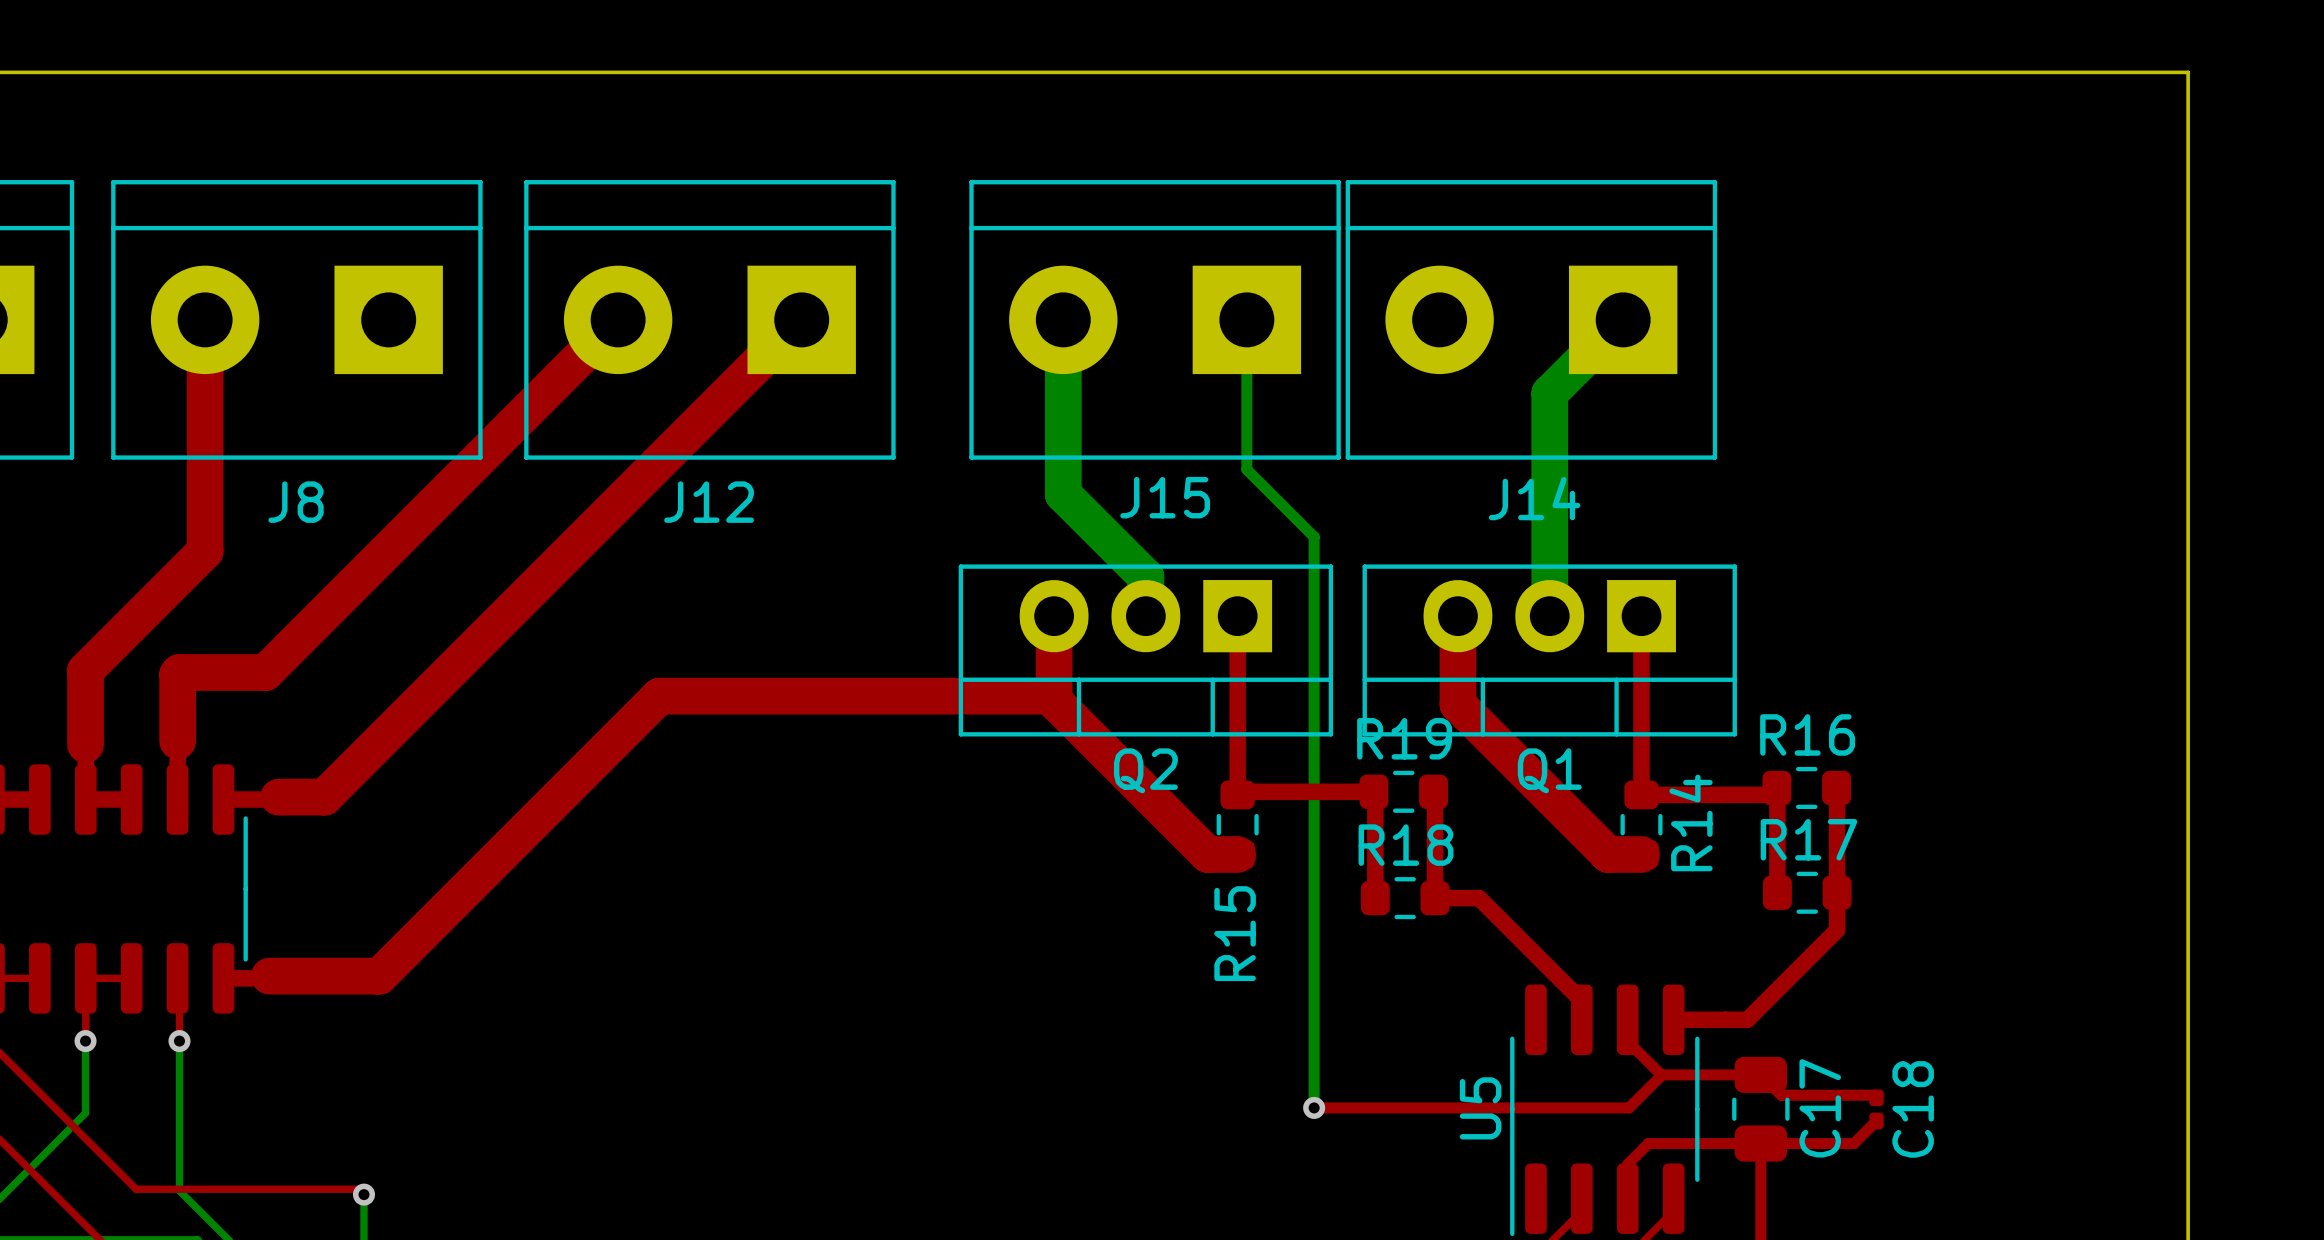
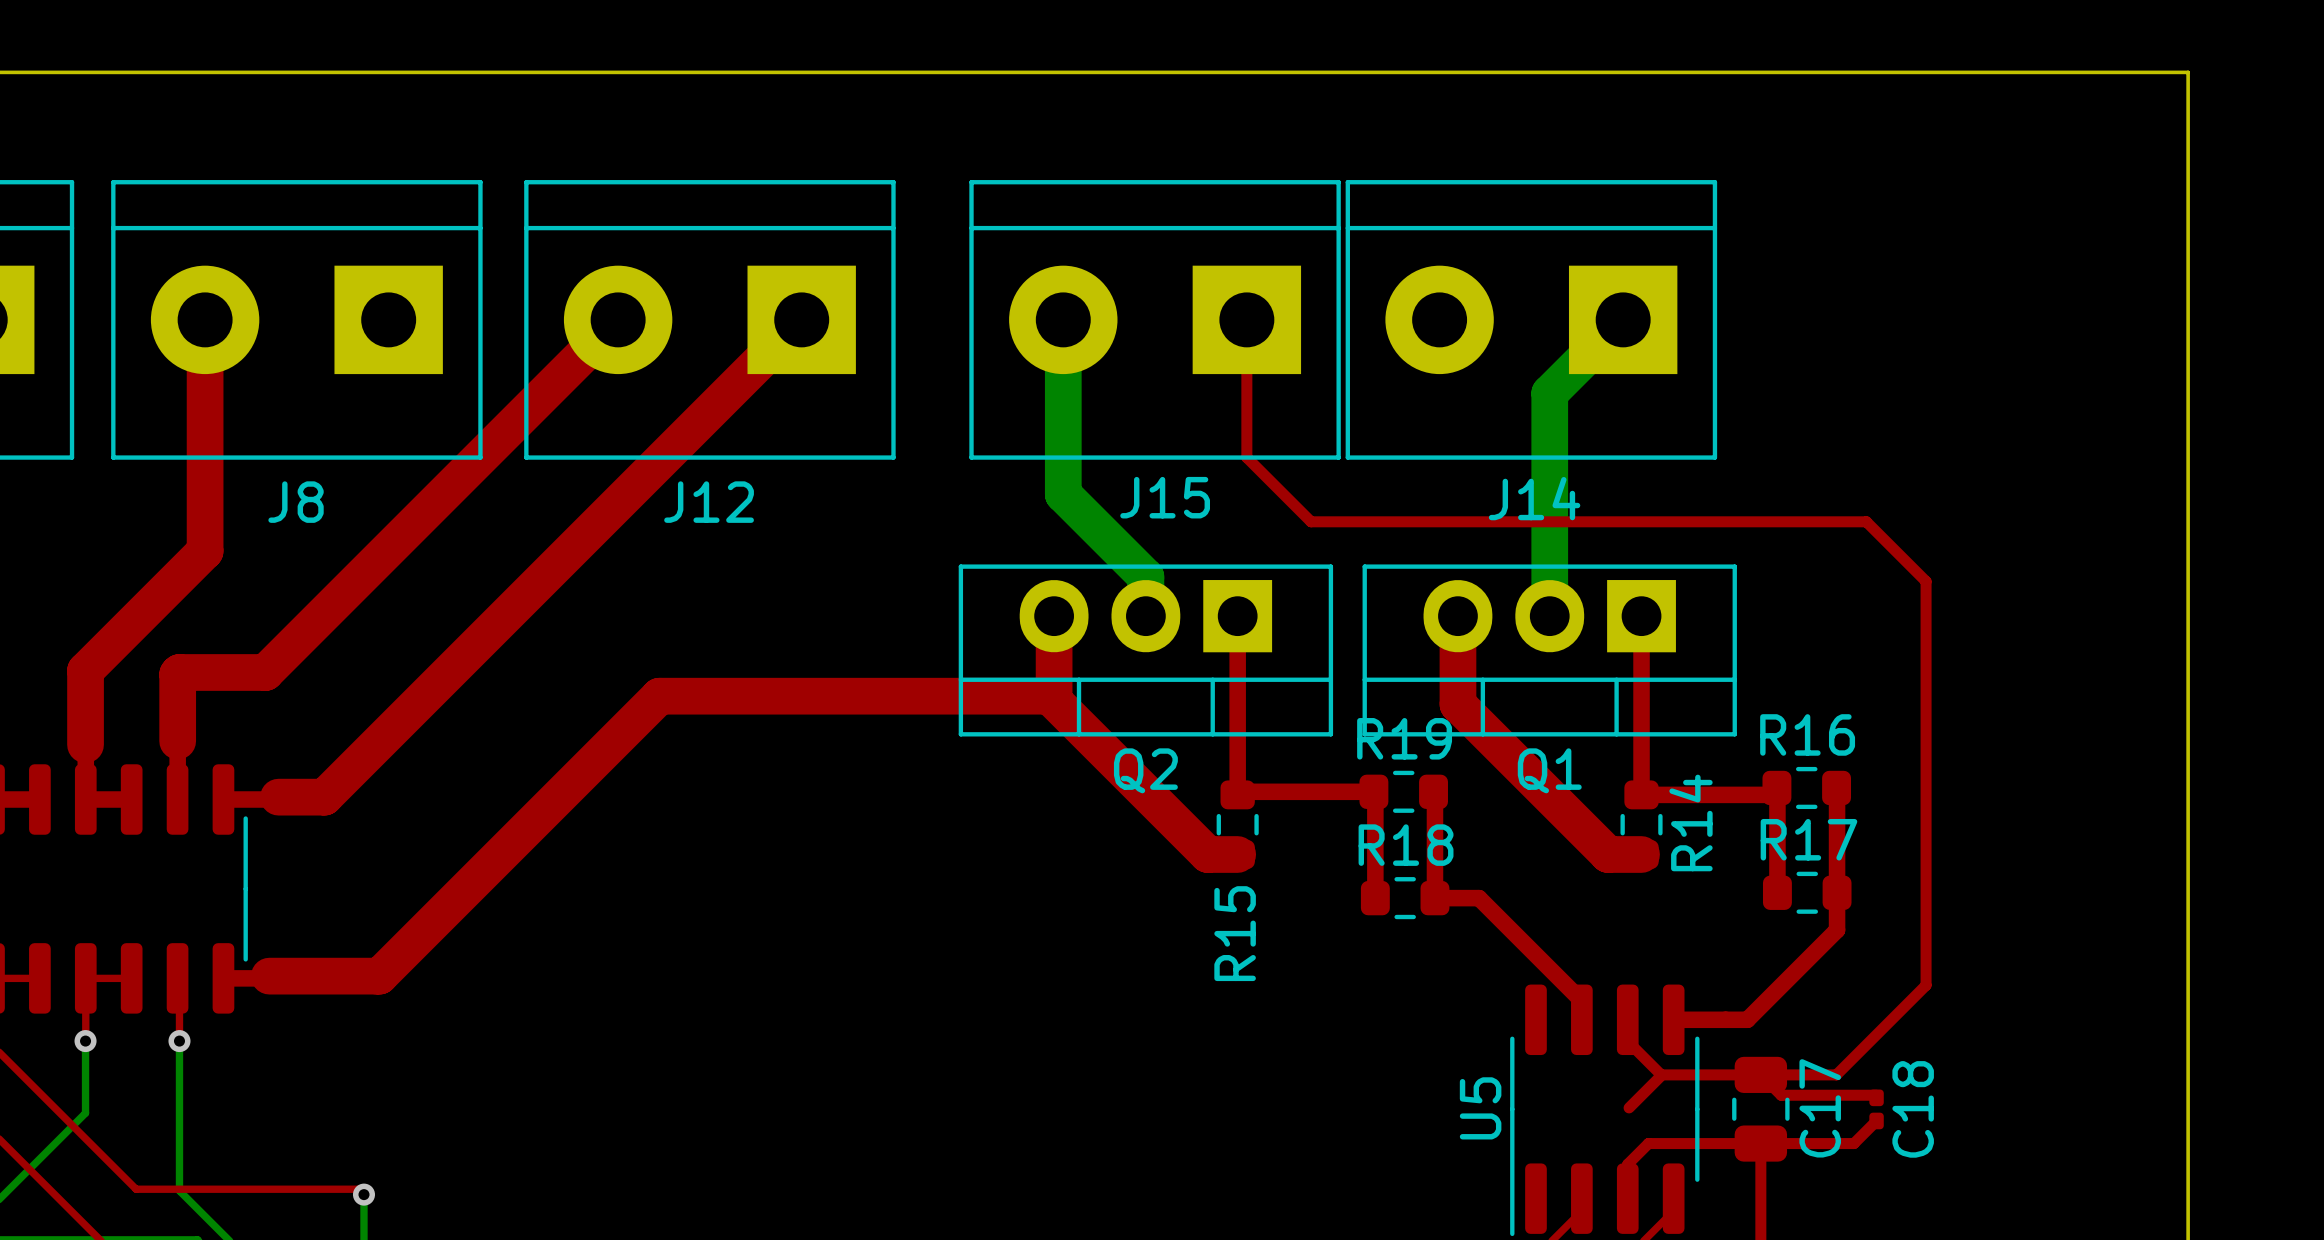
top track: none -> (1246, 319) (1246, 457) (1311, 521) (1866, 521) (1926, 581) (1926, 985) (1836, 1074) (1760, 1074)
bottom track: (1246, 319) (1246, 469) (1314, 536) (1314, 1107) -> none
top track: (1314, 1107) (1629, 1107) -> none
via: (1314, 1107) -> none

